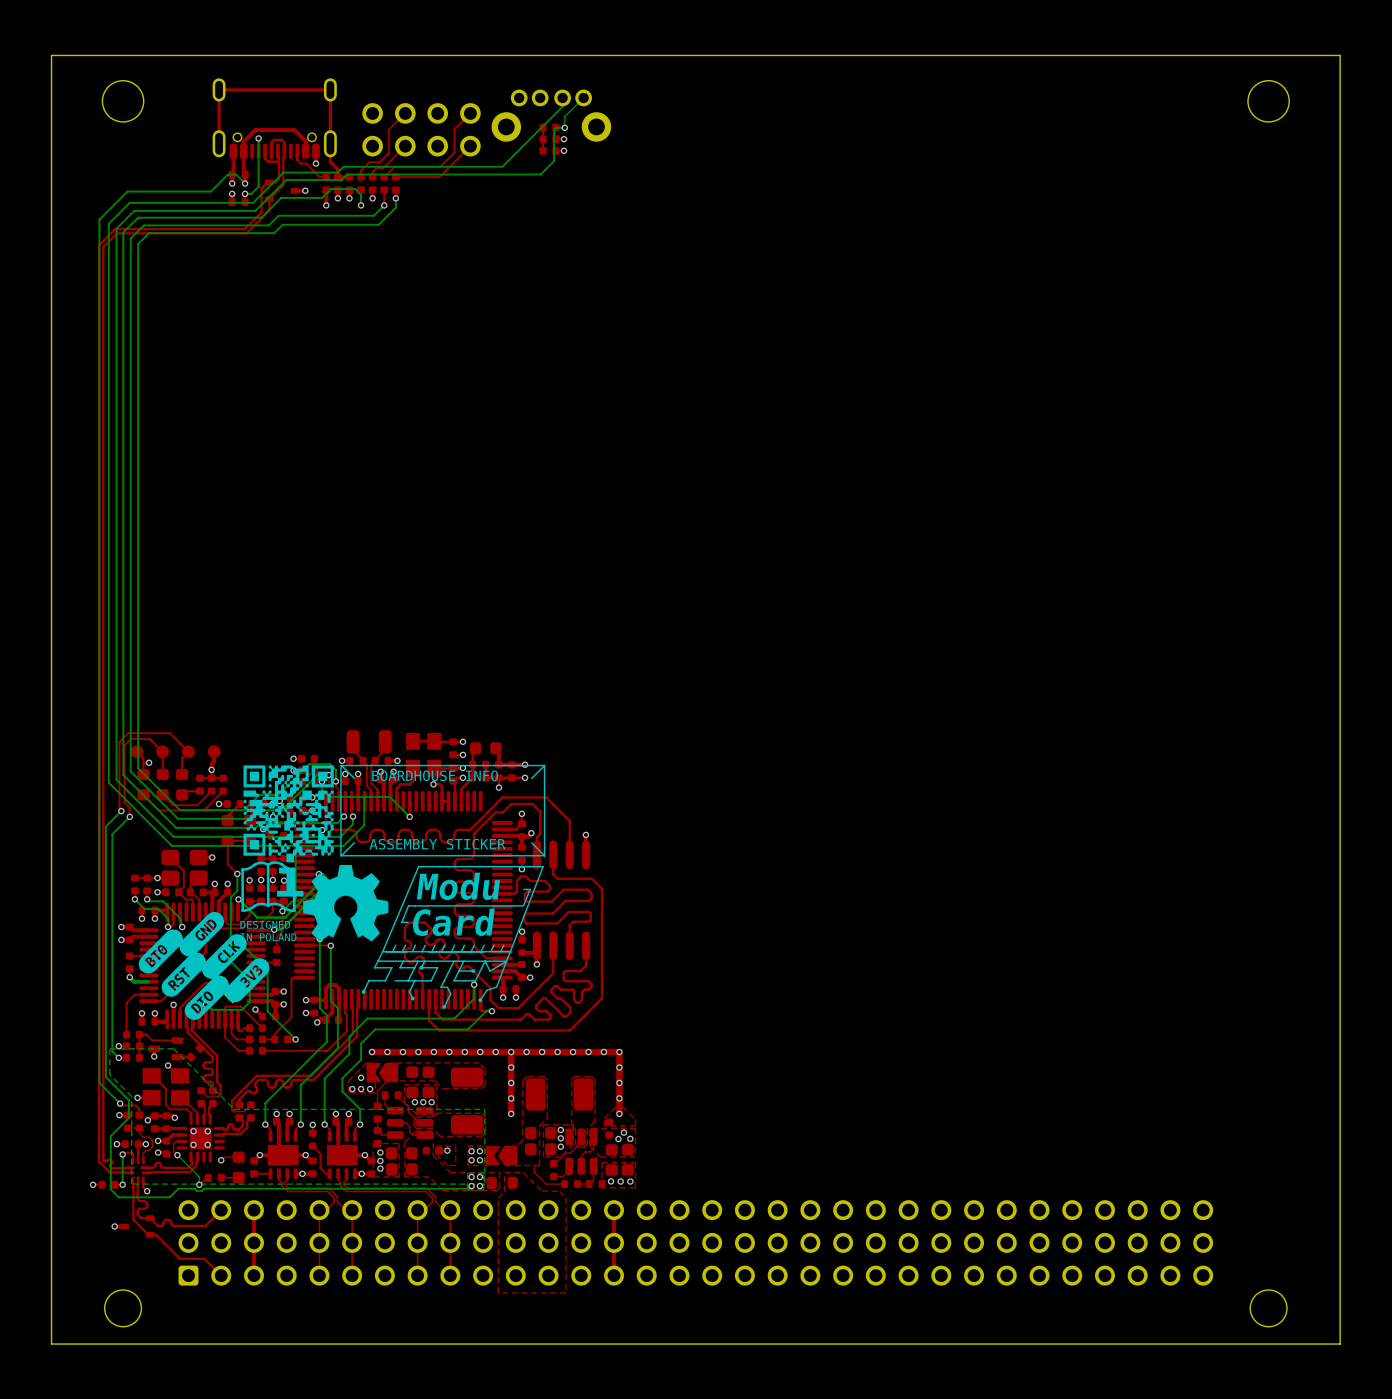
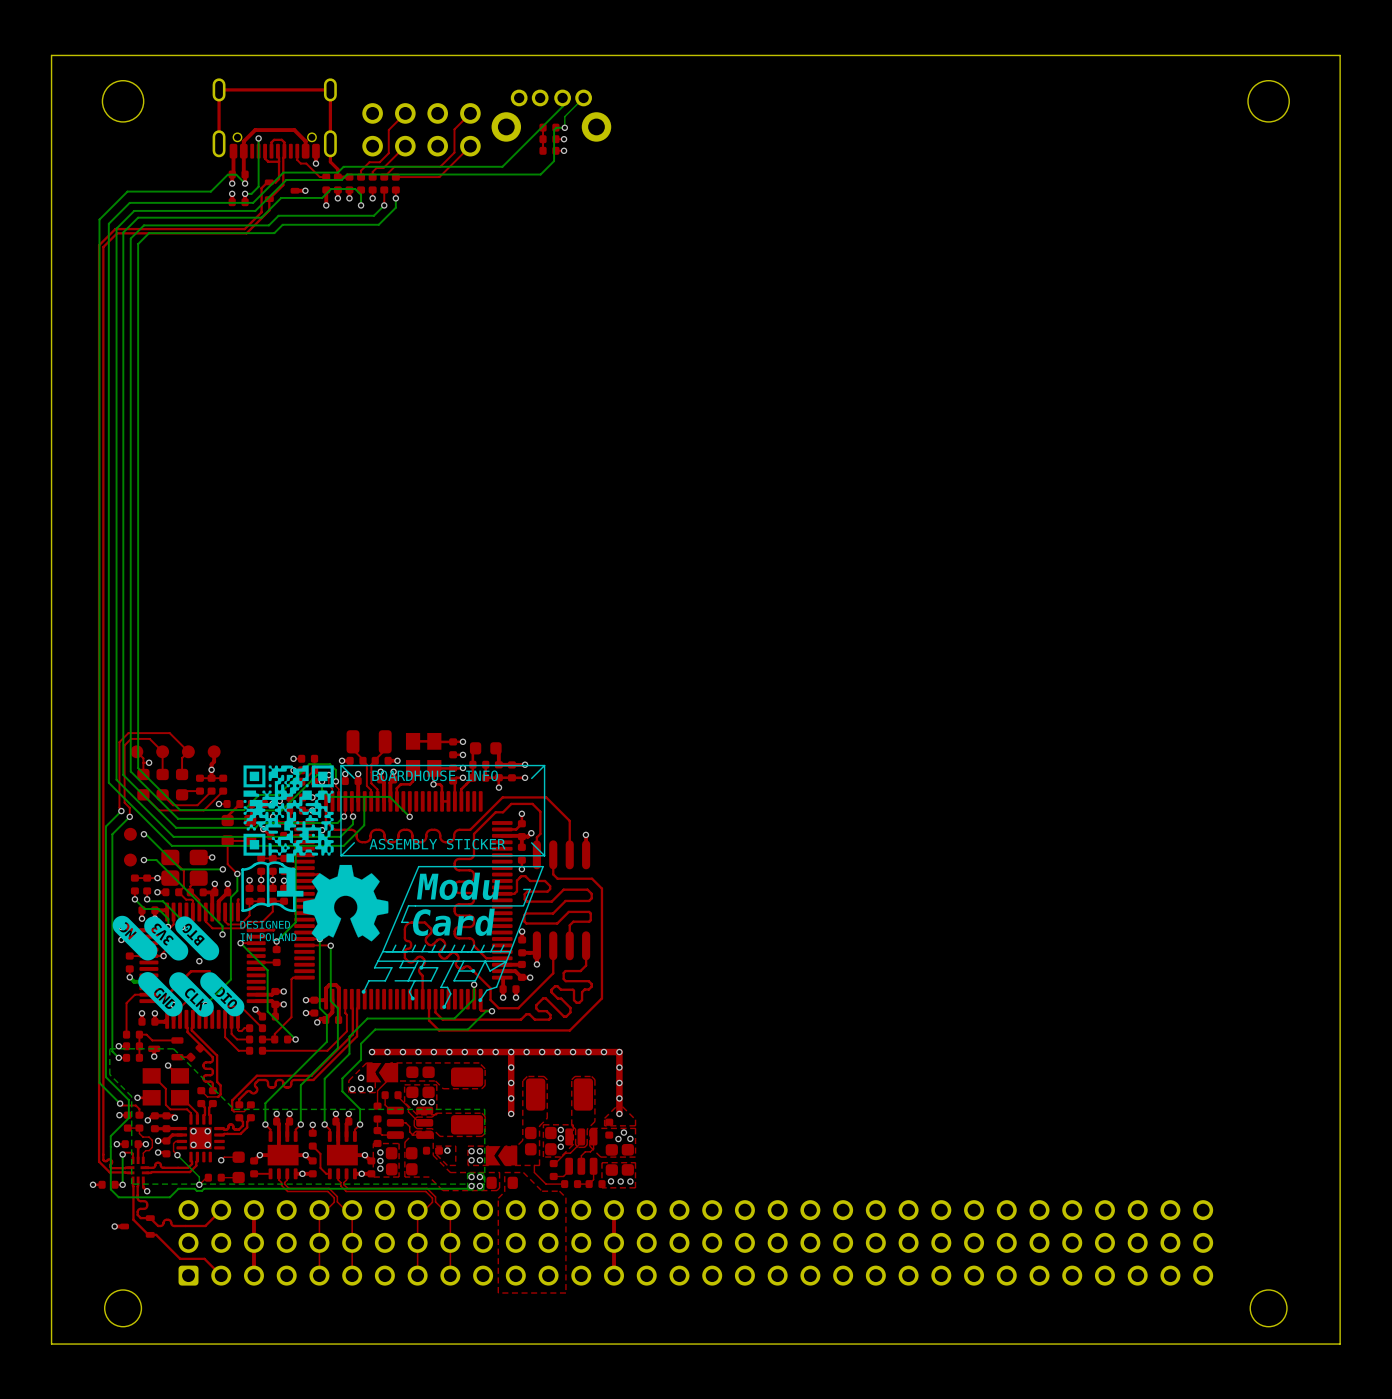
part: none -> (130, 834)
bottom track: none -> (143, 834) (180, 869) (222, 869)
via: none -> (143, 834)
part: none -> (130, 860)
bottom track: none -> (143, 860) (156, 860) (222, 926) (222, 934)
via: none -> (143, 860)
via: none -> (222, 869)
bottom track: (318, 874) (322, 874) (325, 877) (325, 885) (281, 929) (274, 929) -> none
via: (318, 874) -> none
bottom track: (319, 882) (285, 917) (257, 917) (238, 899) -> none
bottom track: (295, 897) (282, 911) -> (295, 897) (295, 922) (276, 941)
via: (238, 899) -> none
drawing shape: [179, 911, 225, 957] -> [175, 916, 220, 961]
top track: (282, 911) (282, 931) (276, 937) (276, 941) -> none
via: (282, 911) -> none
top track: (205, 912) (205, 952) (198, 959) -> none
drawing: none -> [112, 915, 245, 1017]
drawing: [138, 929, 270, 1020] -> none
via position: (274, 929) -> (276, 941)
via: none -> (222, 934)
via: none -> (163, 956)
via: none -> (199, 961)
bottom track: (230, 961) (249, 980) (249, 1001) (241, 1009) (212, 1009) (205, 1004) -> (230, 961) (230, 979) (205, 1004)
top track: (221, 982) (205, 982) (186, 1001) -> none

